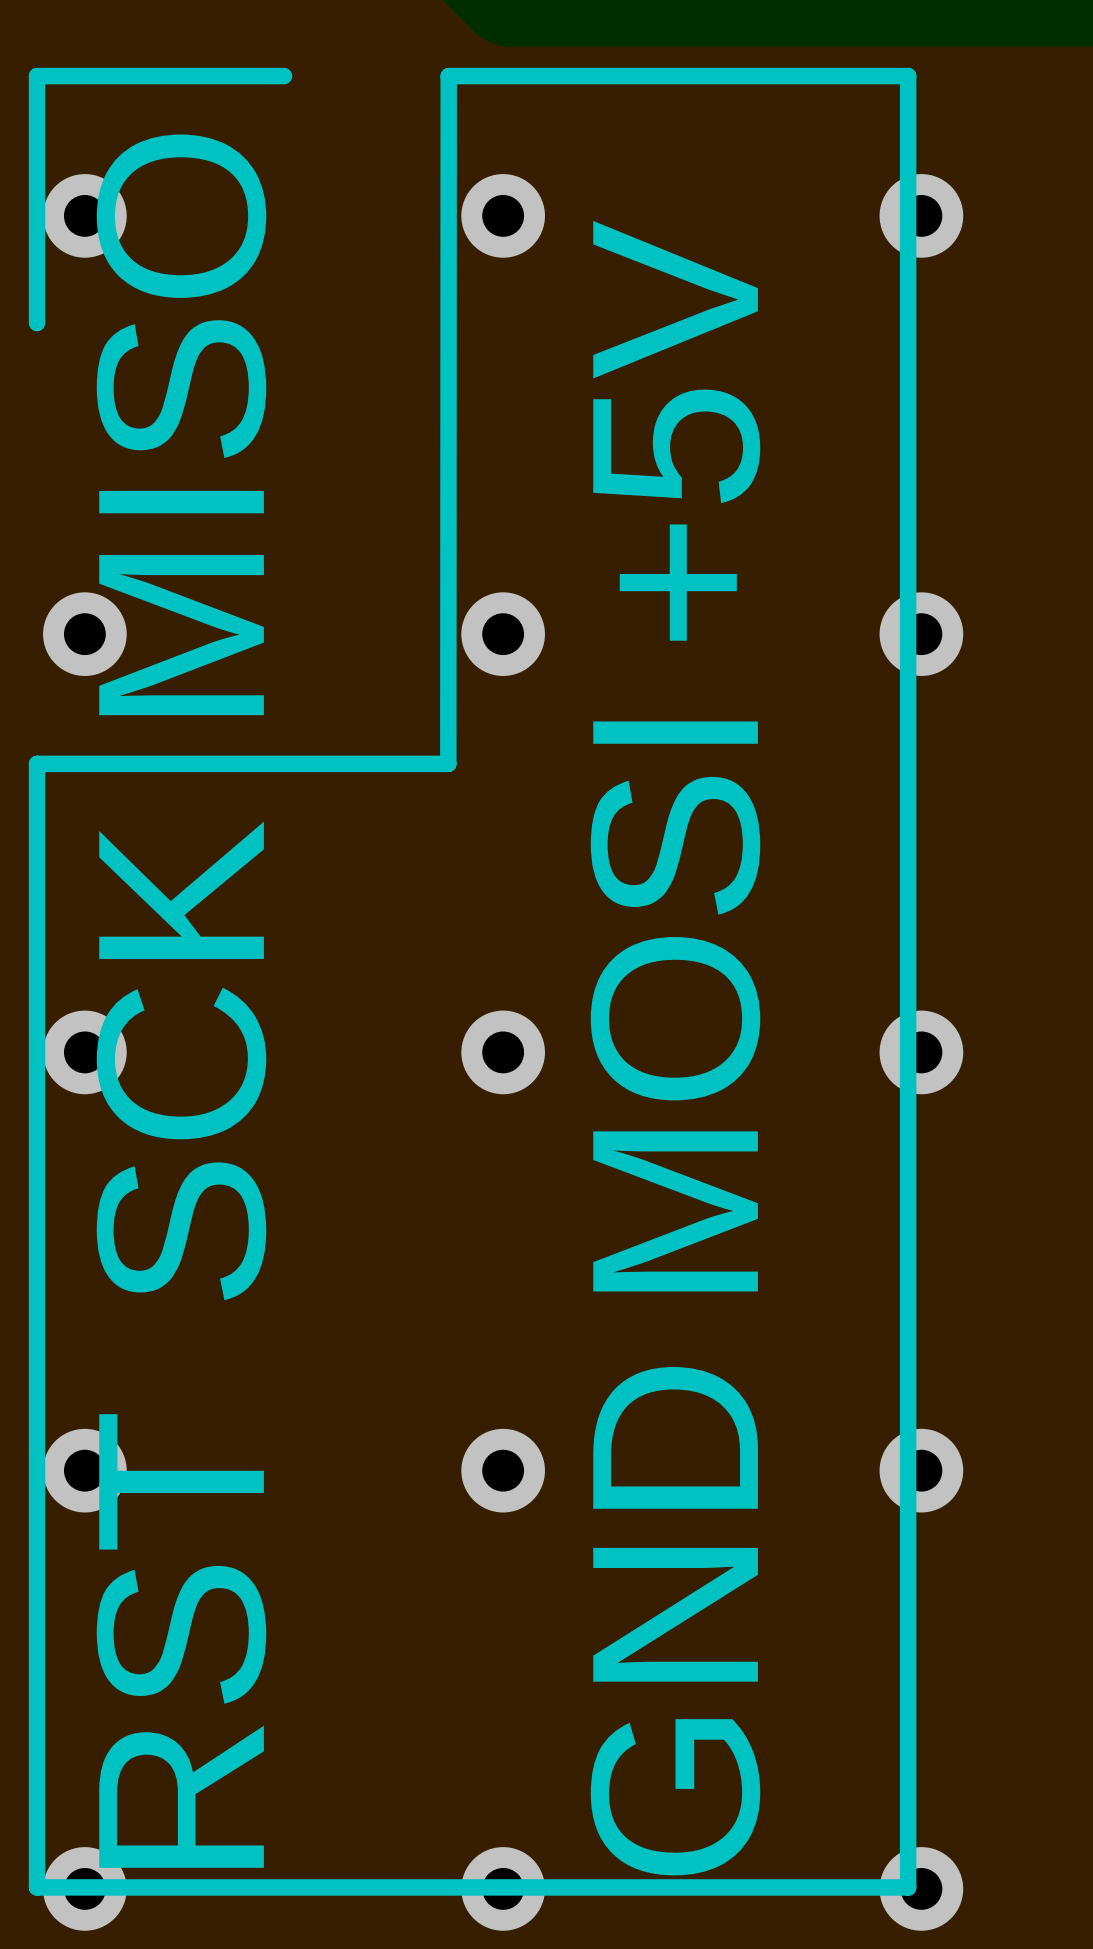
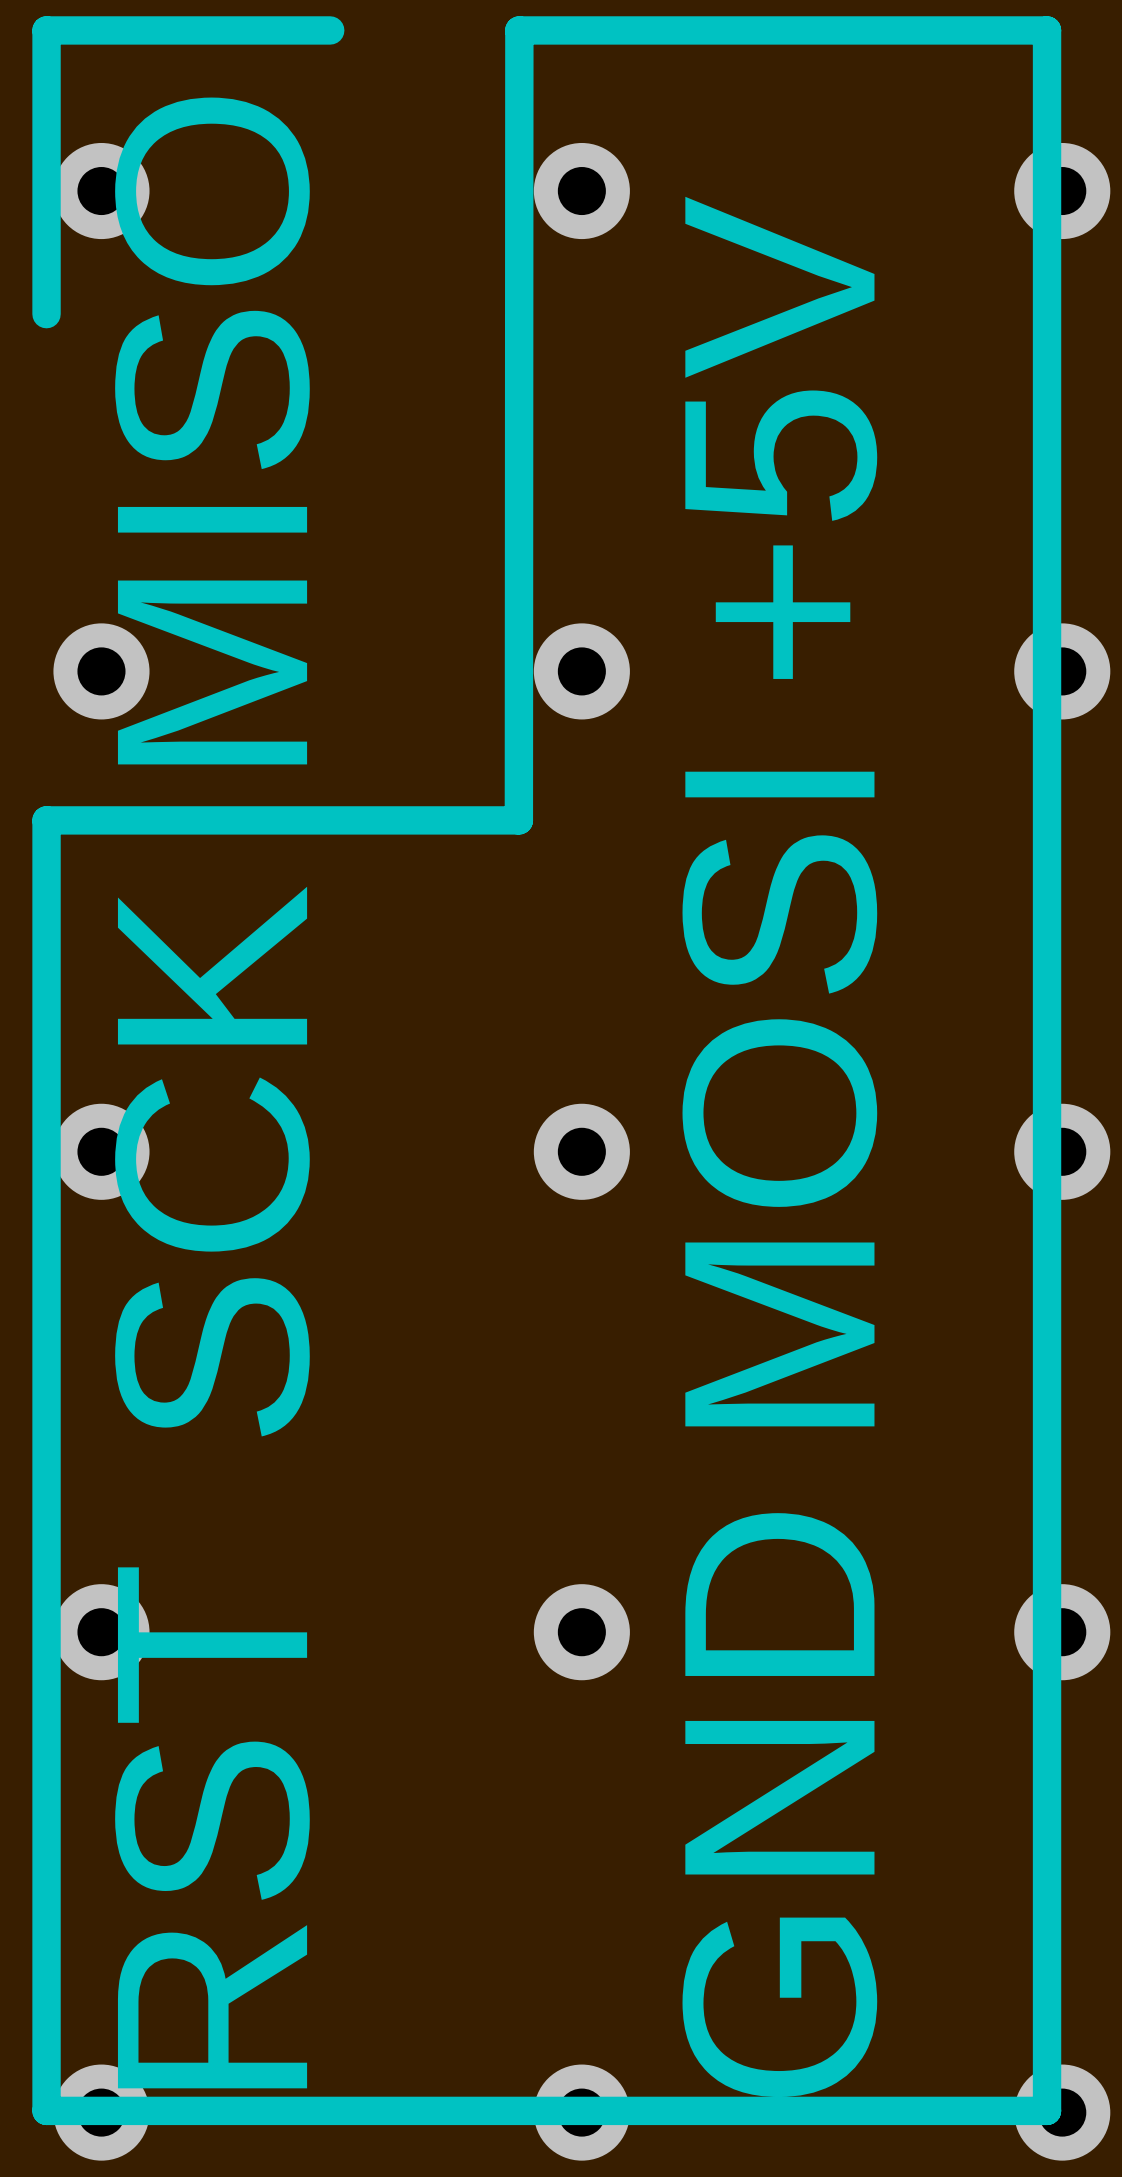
line width: thin (284, 76) (37, 76) (37, 323) -> thick (330, 30) (46, 30) (46, 314)
line width: thin (448, 76) (908, 76) (908, 1887) (37, 1887) (37, 763) (448, 763) (448, 76) -> thick (519, 30) (1047, 30) (1047, 2110) (46, 2110) (46, 820) (518, 820) (519, 30)

